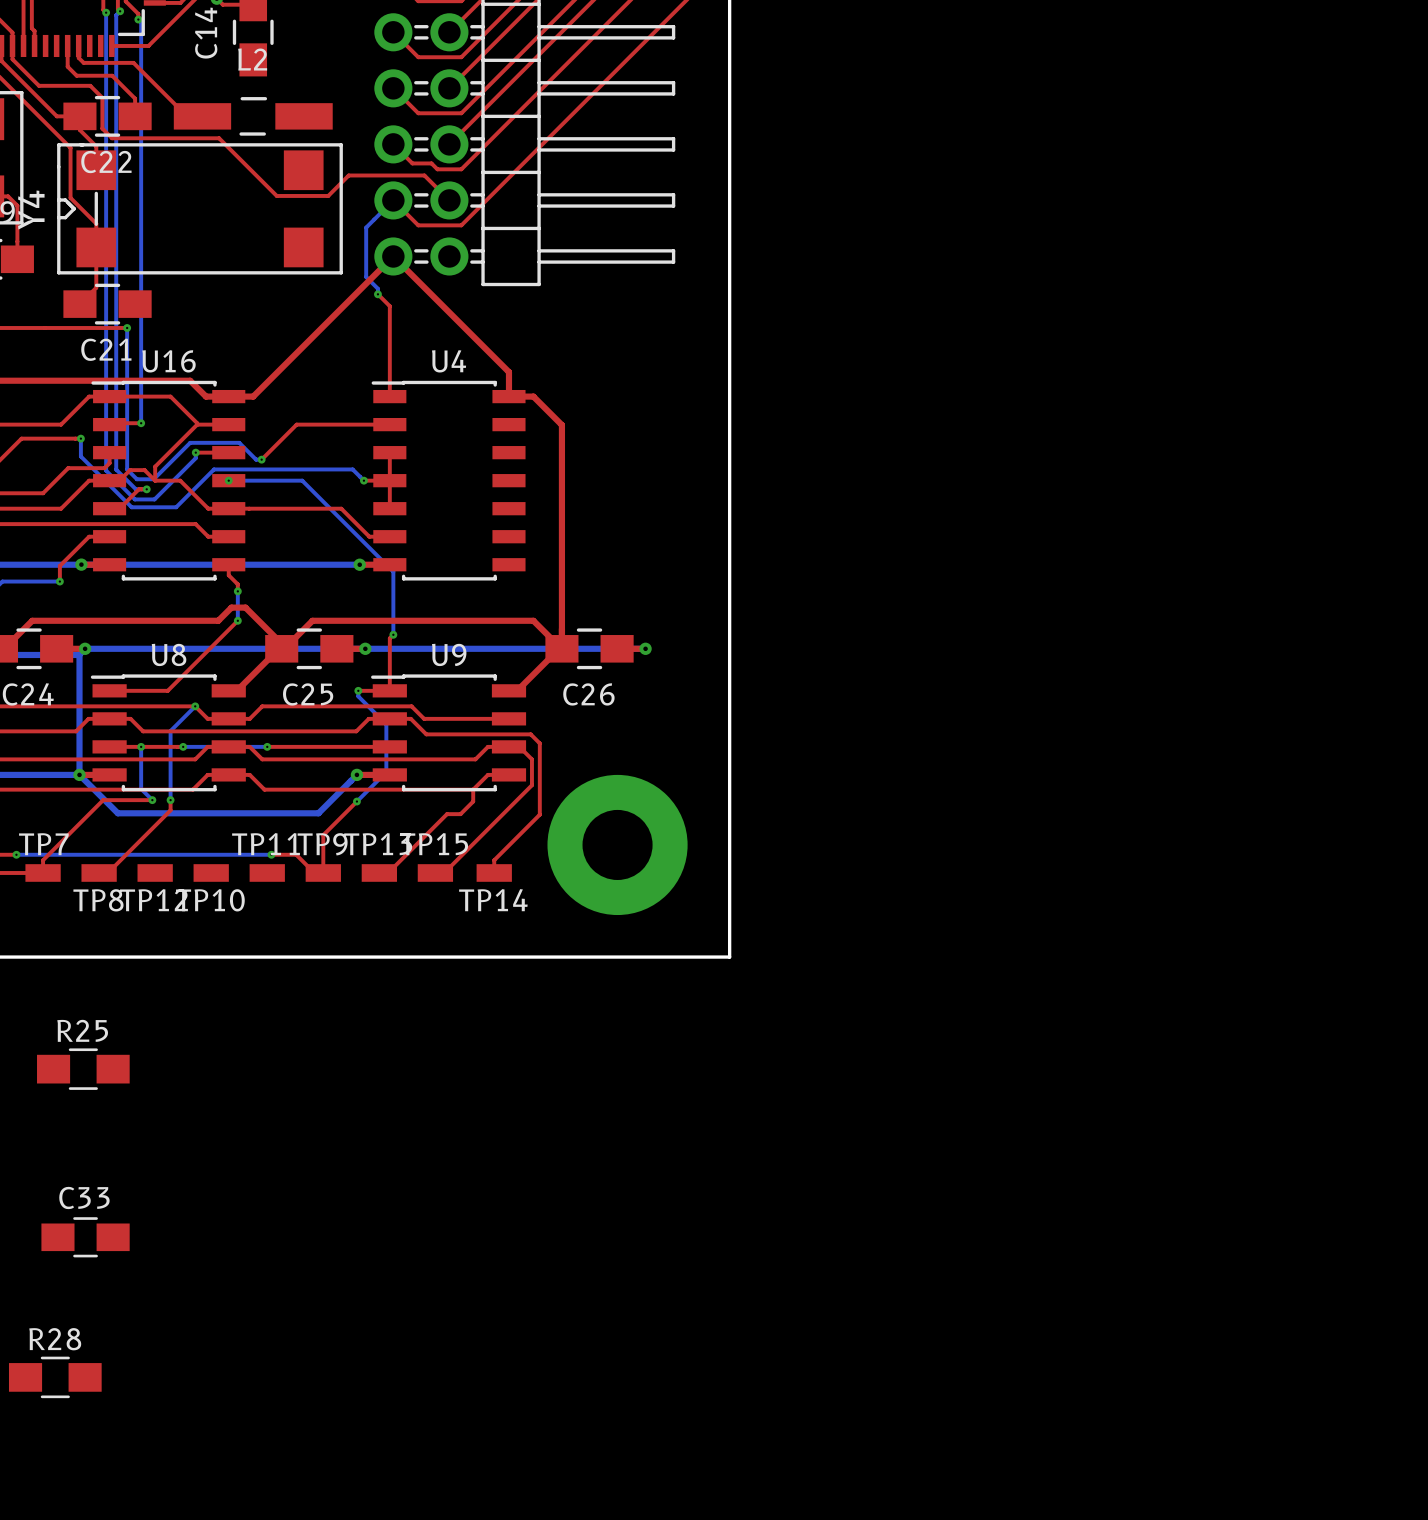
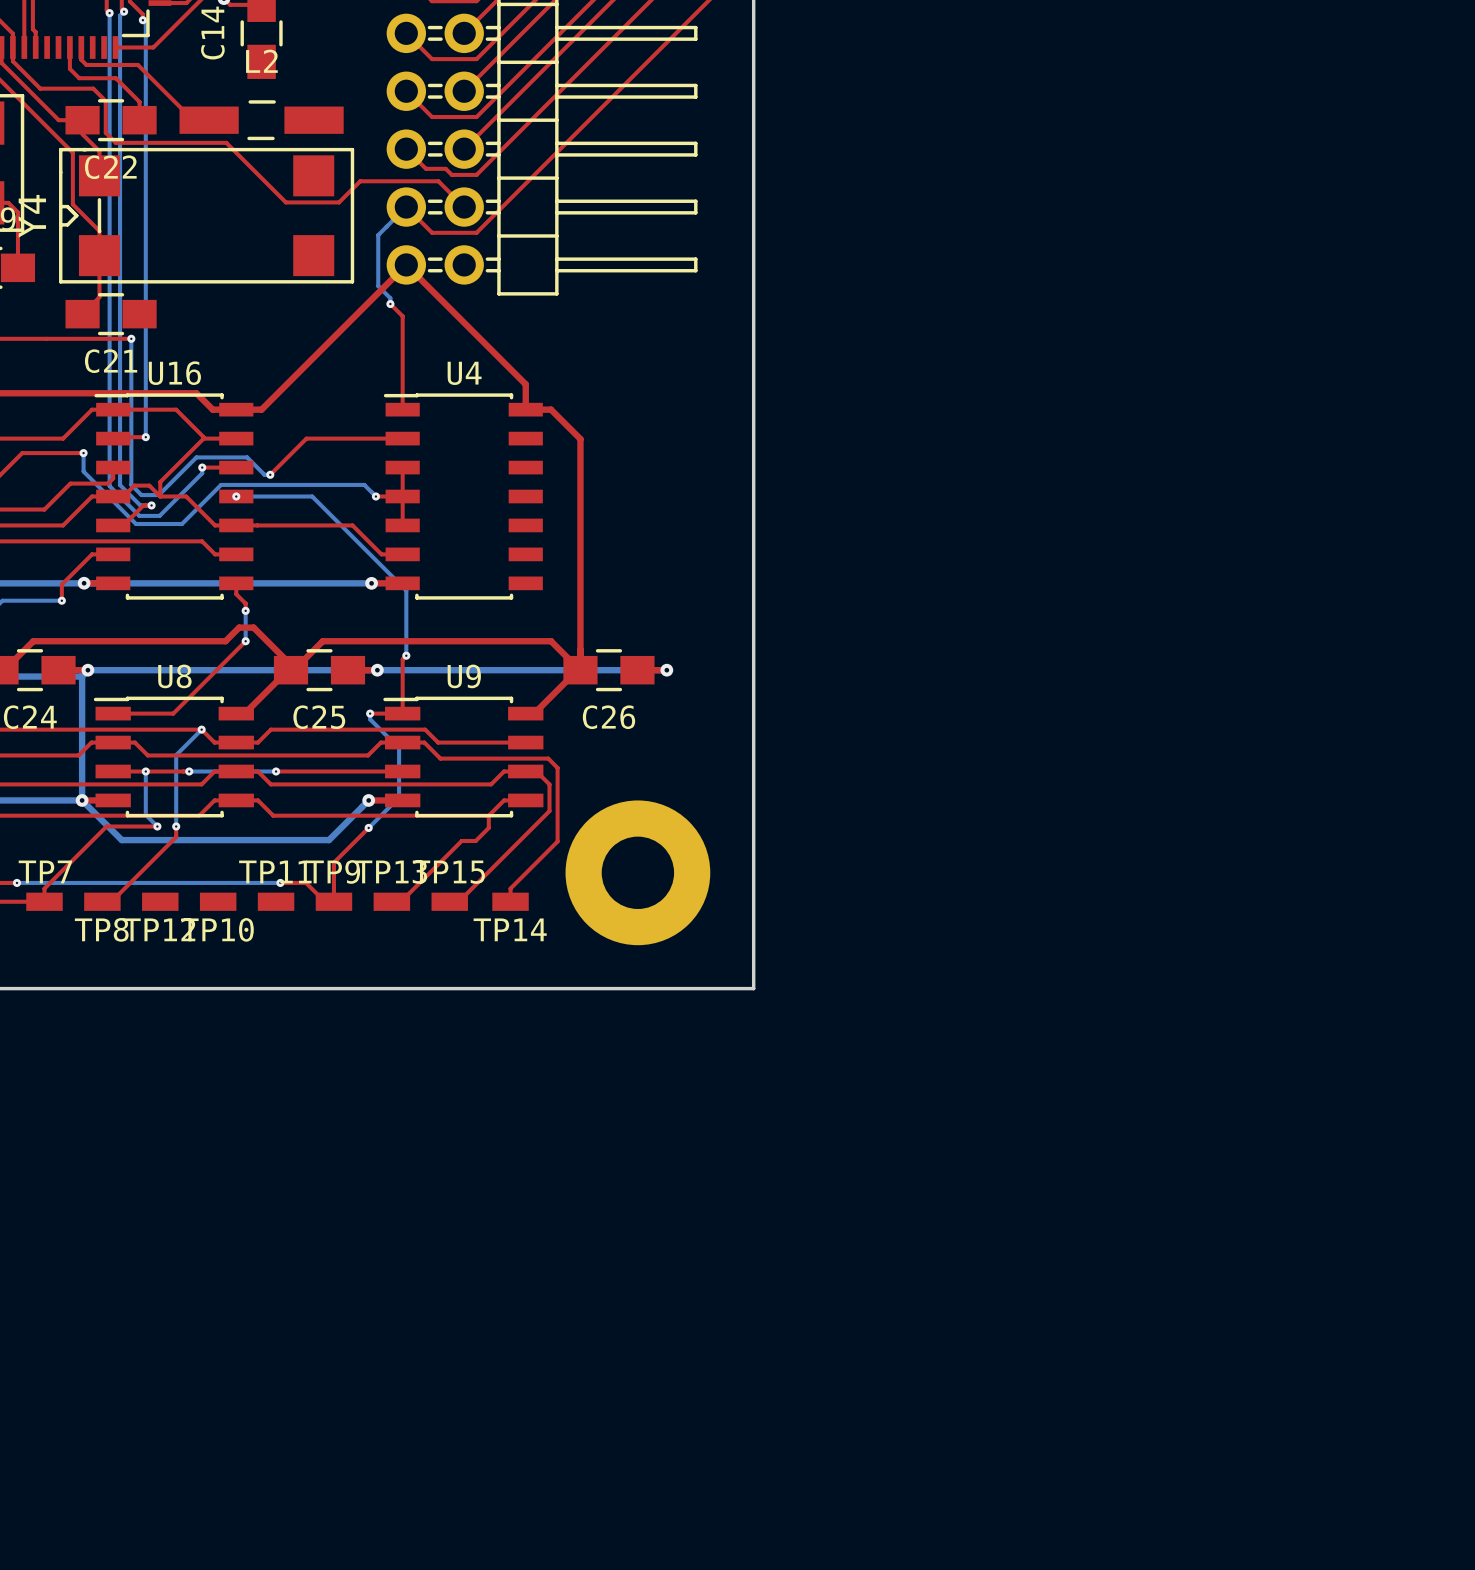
R25: (83, 1069) -> none
C33: (85, 1237) -> none
R28: (55, 1377) -> none

